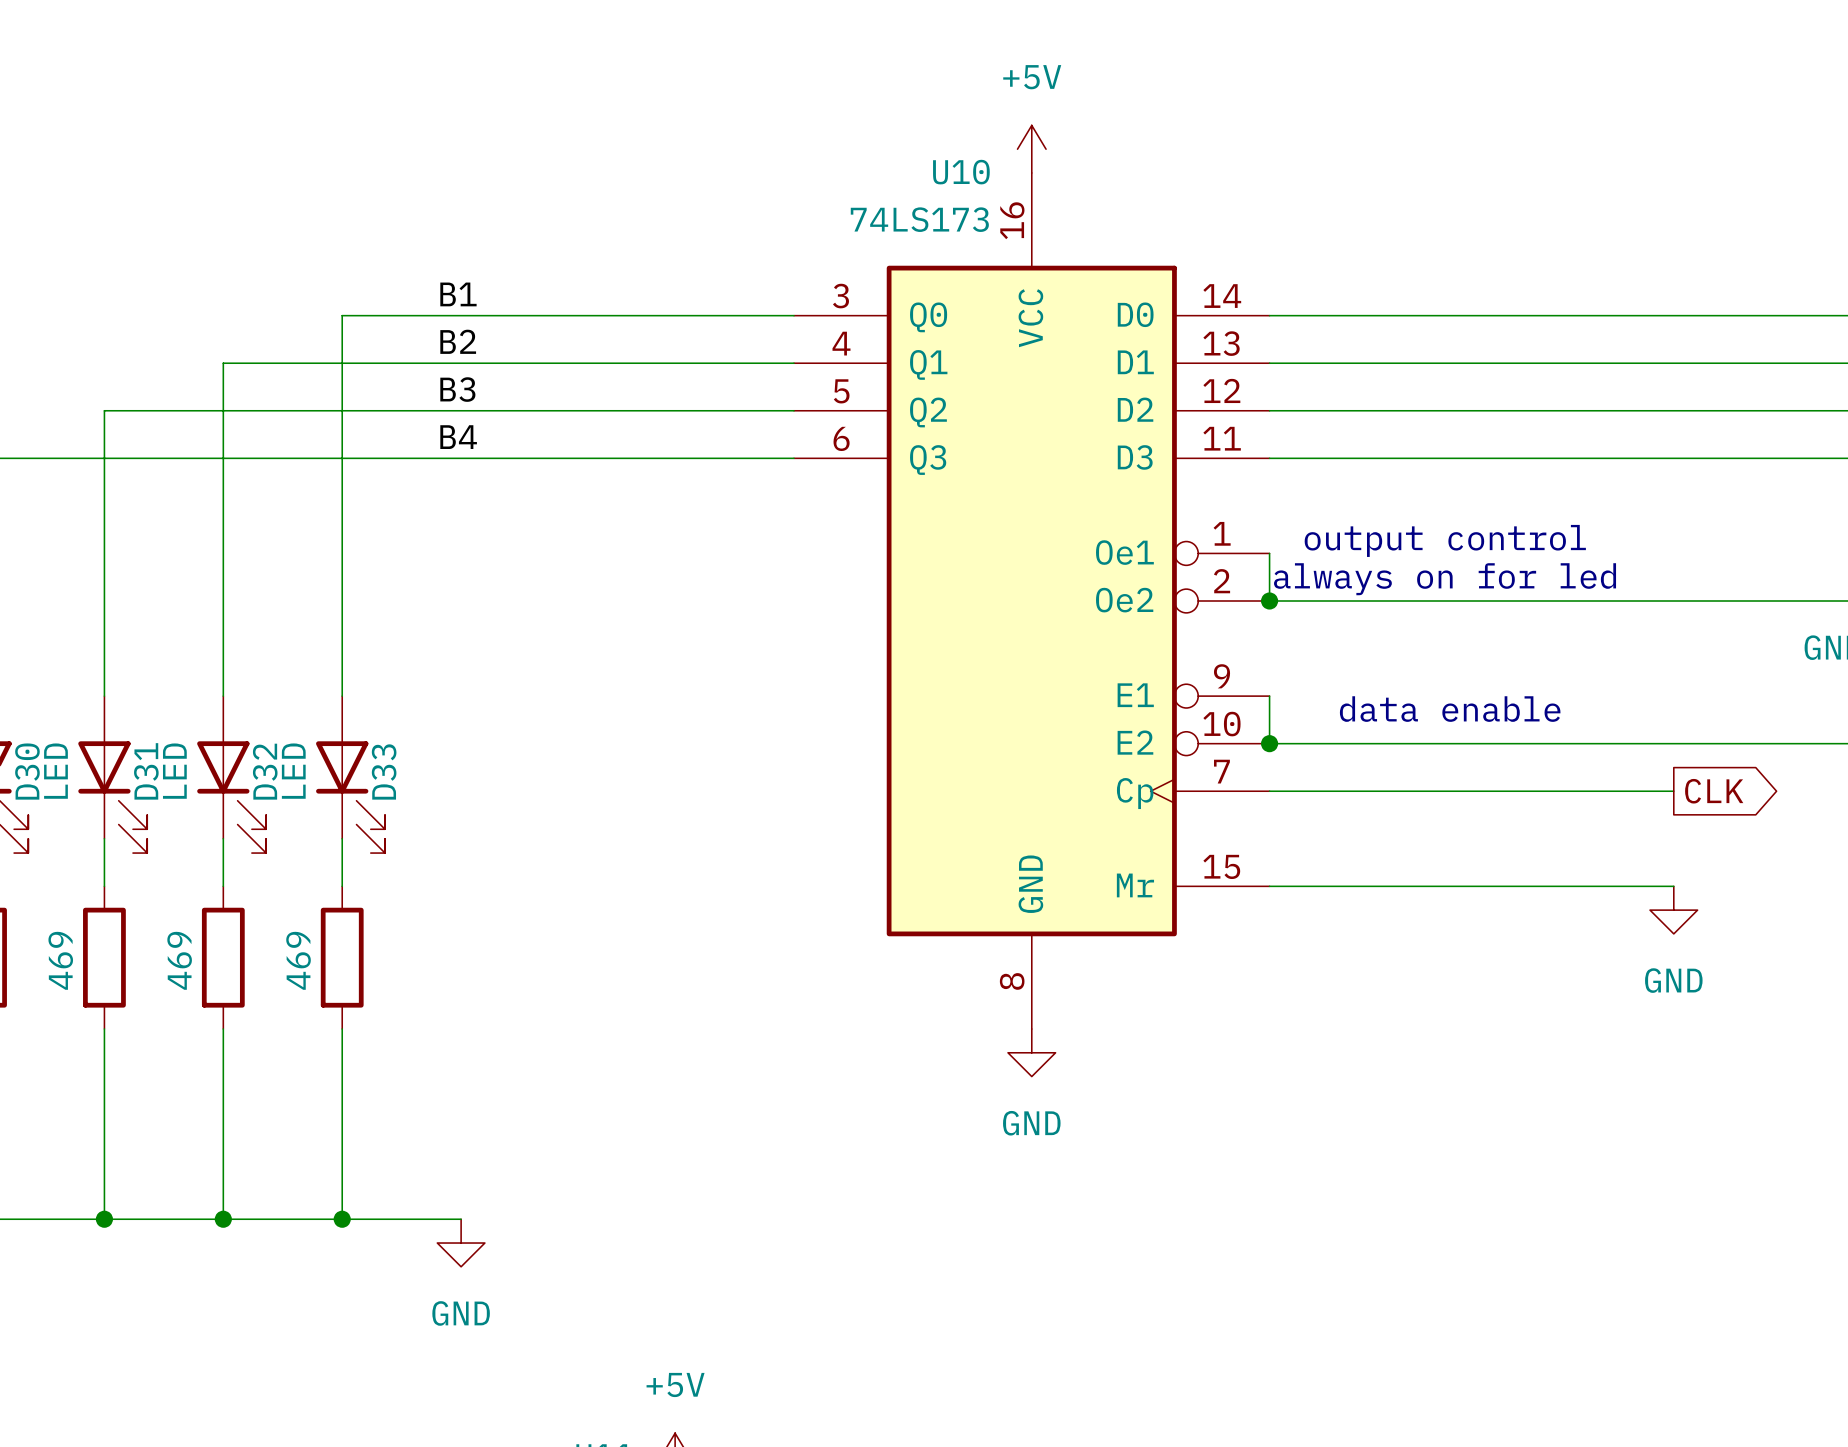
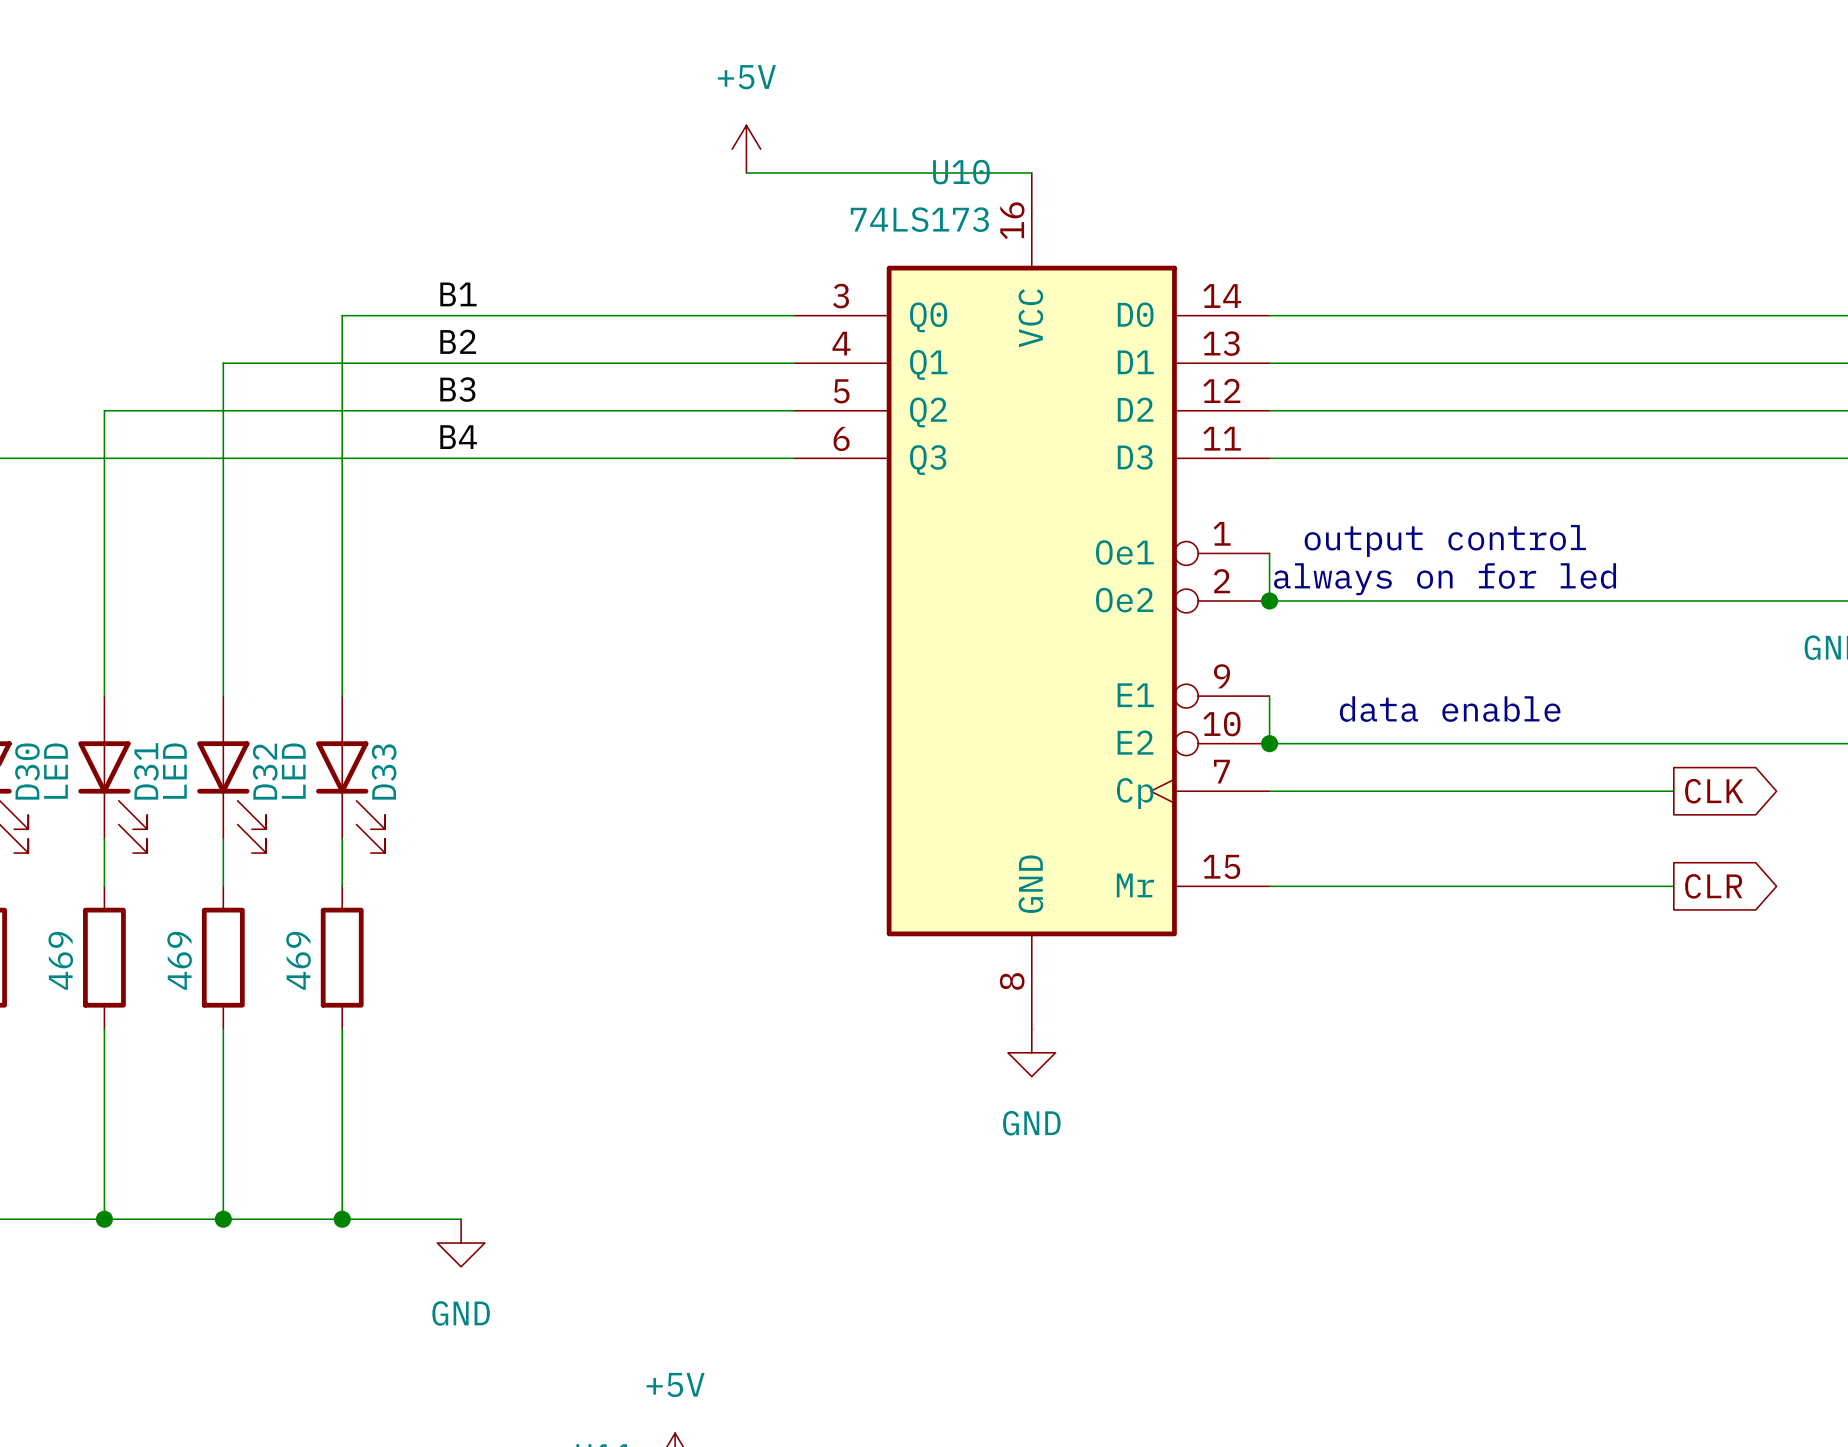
power symbol position: +5V (1031, 149) -> +5V (746, 149)
wire: none -> (746, 172) (1031, 172)
global label: none -> CLR (1713, 886)
power symbol: GND (1673, 910) -> none

